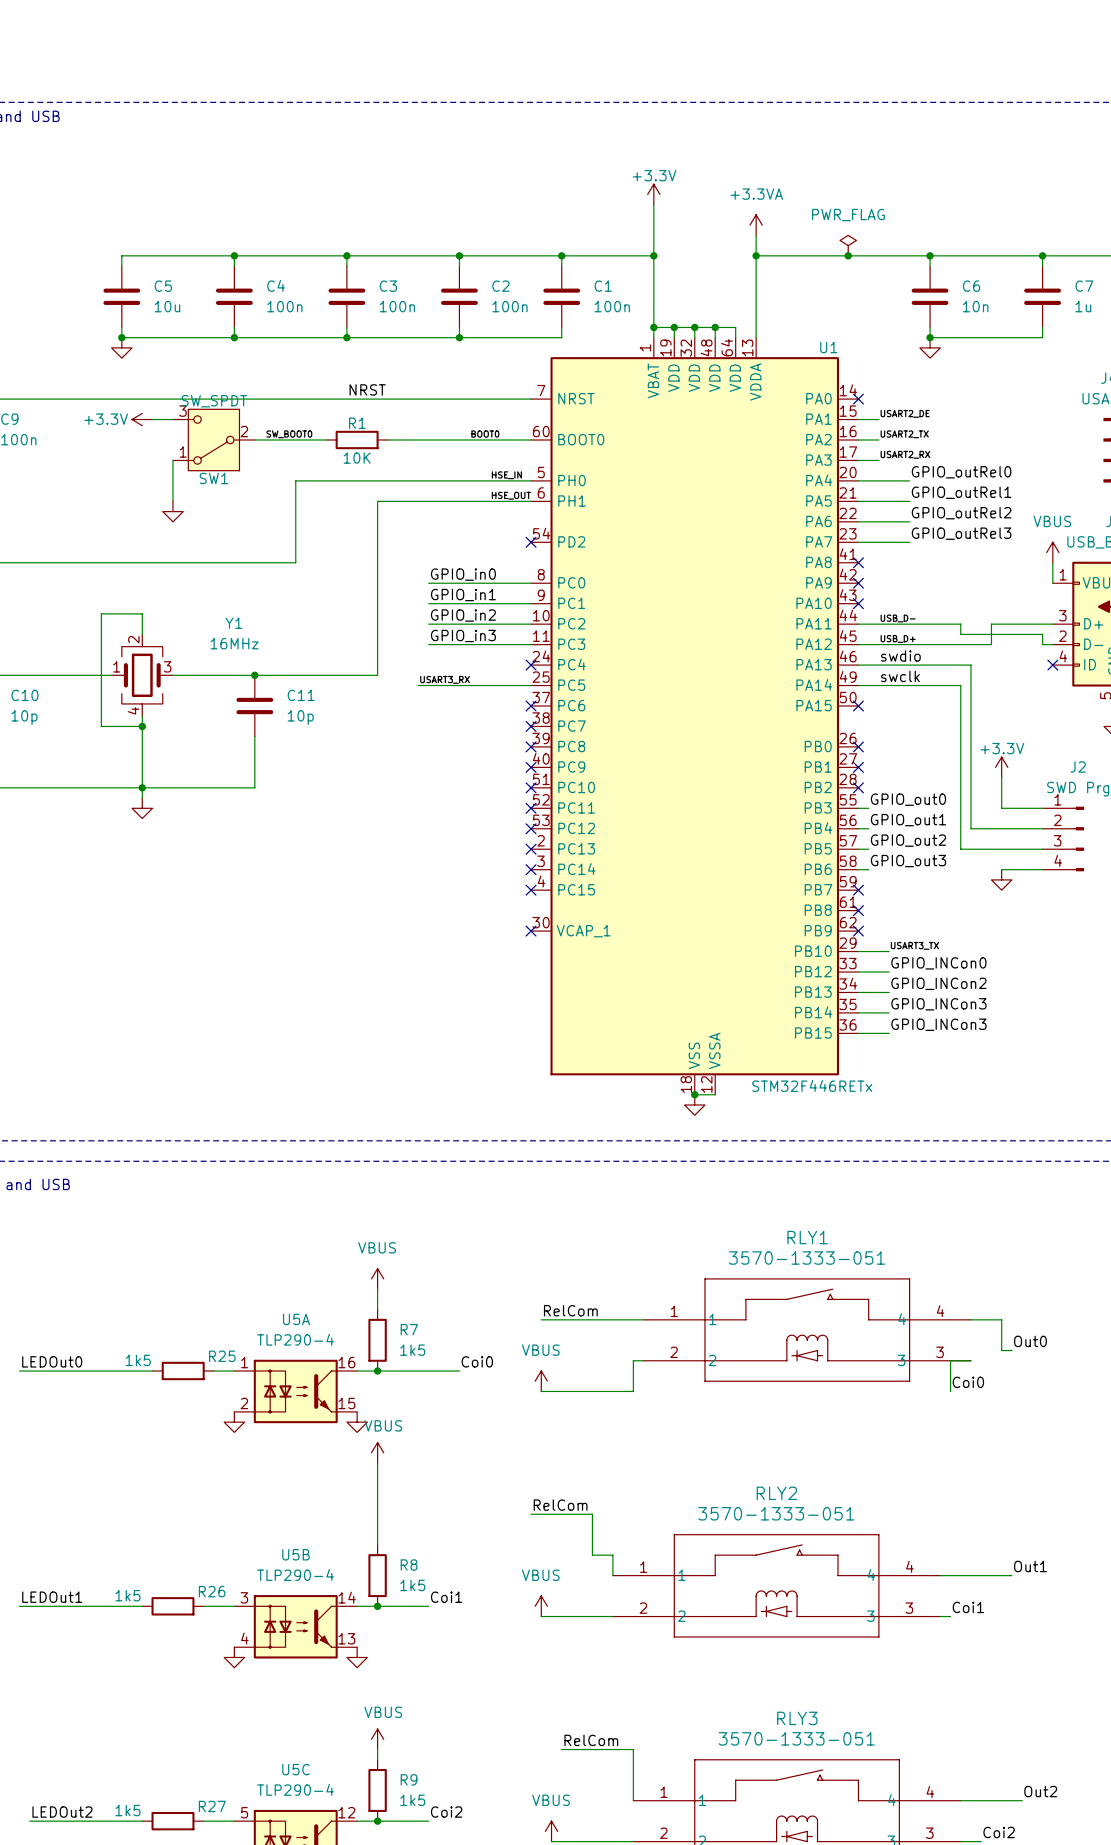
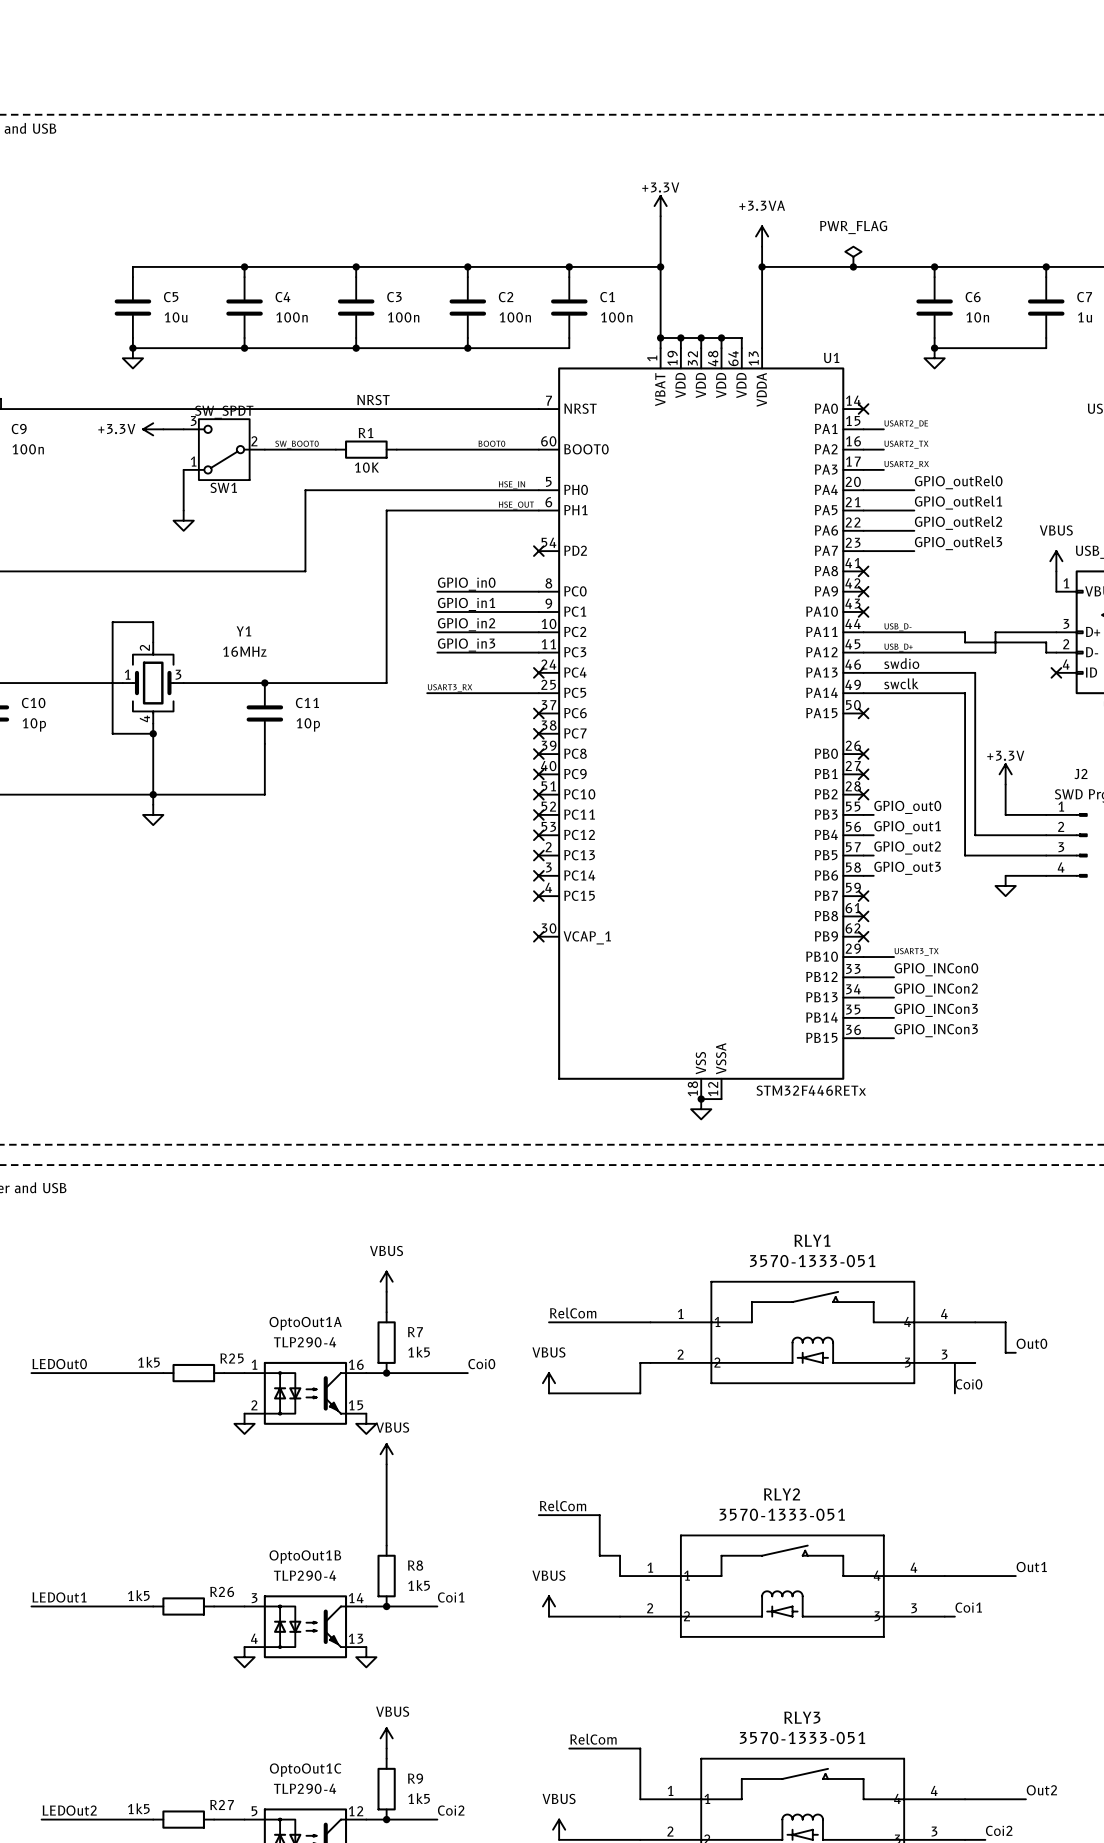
U5A name: U5A (296, 1319) -> OptoOut1A (305, 1323)
U5B name: U5B (295, 1554) -> OptoOut1B (305, 1557)
U5C name: U5C (295, 1769) -> OptoOut1C (305, 1770)

